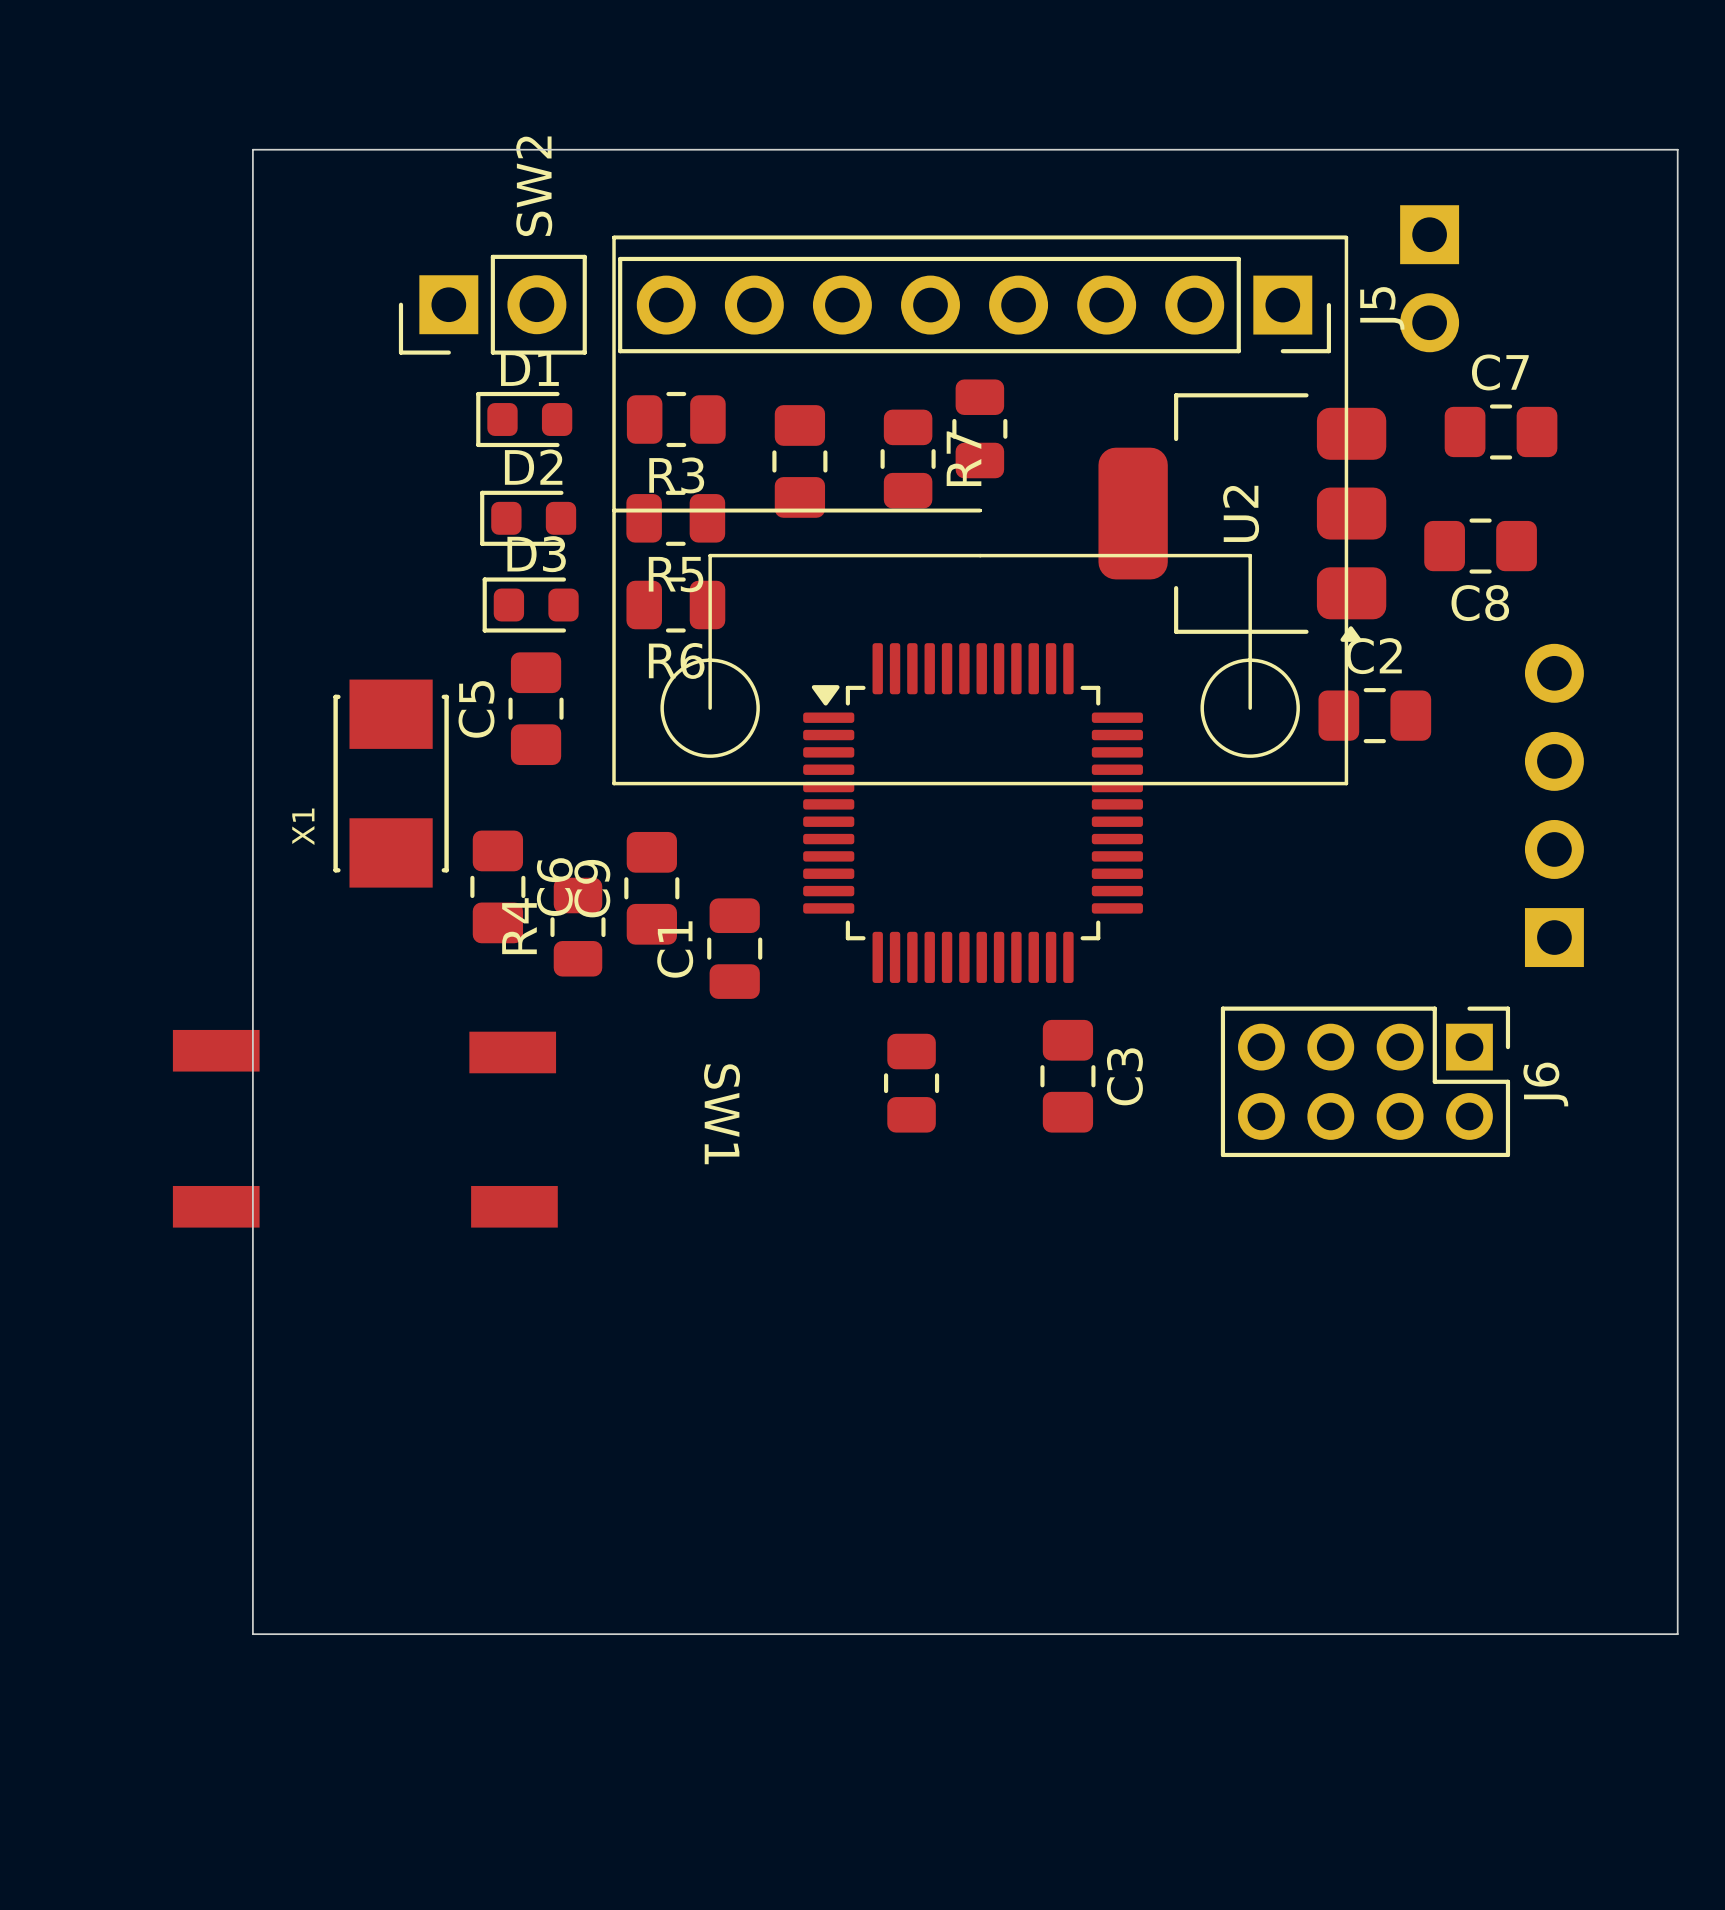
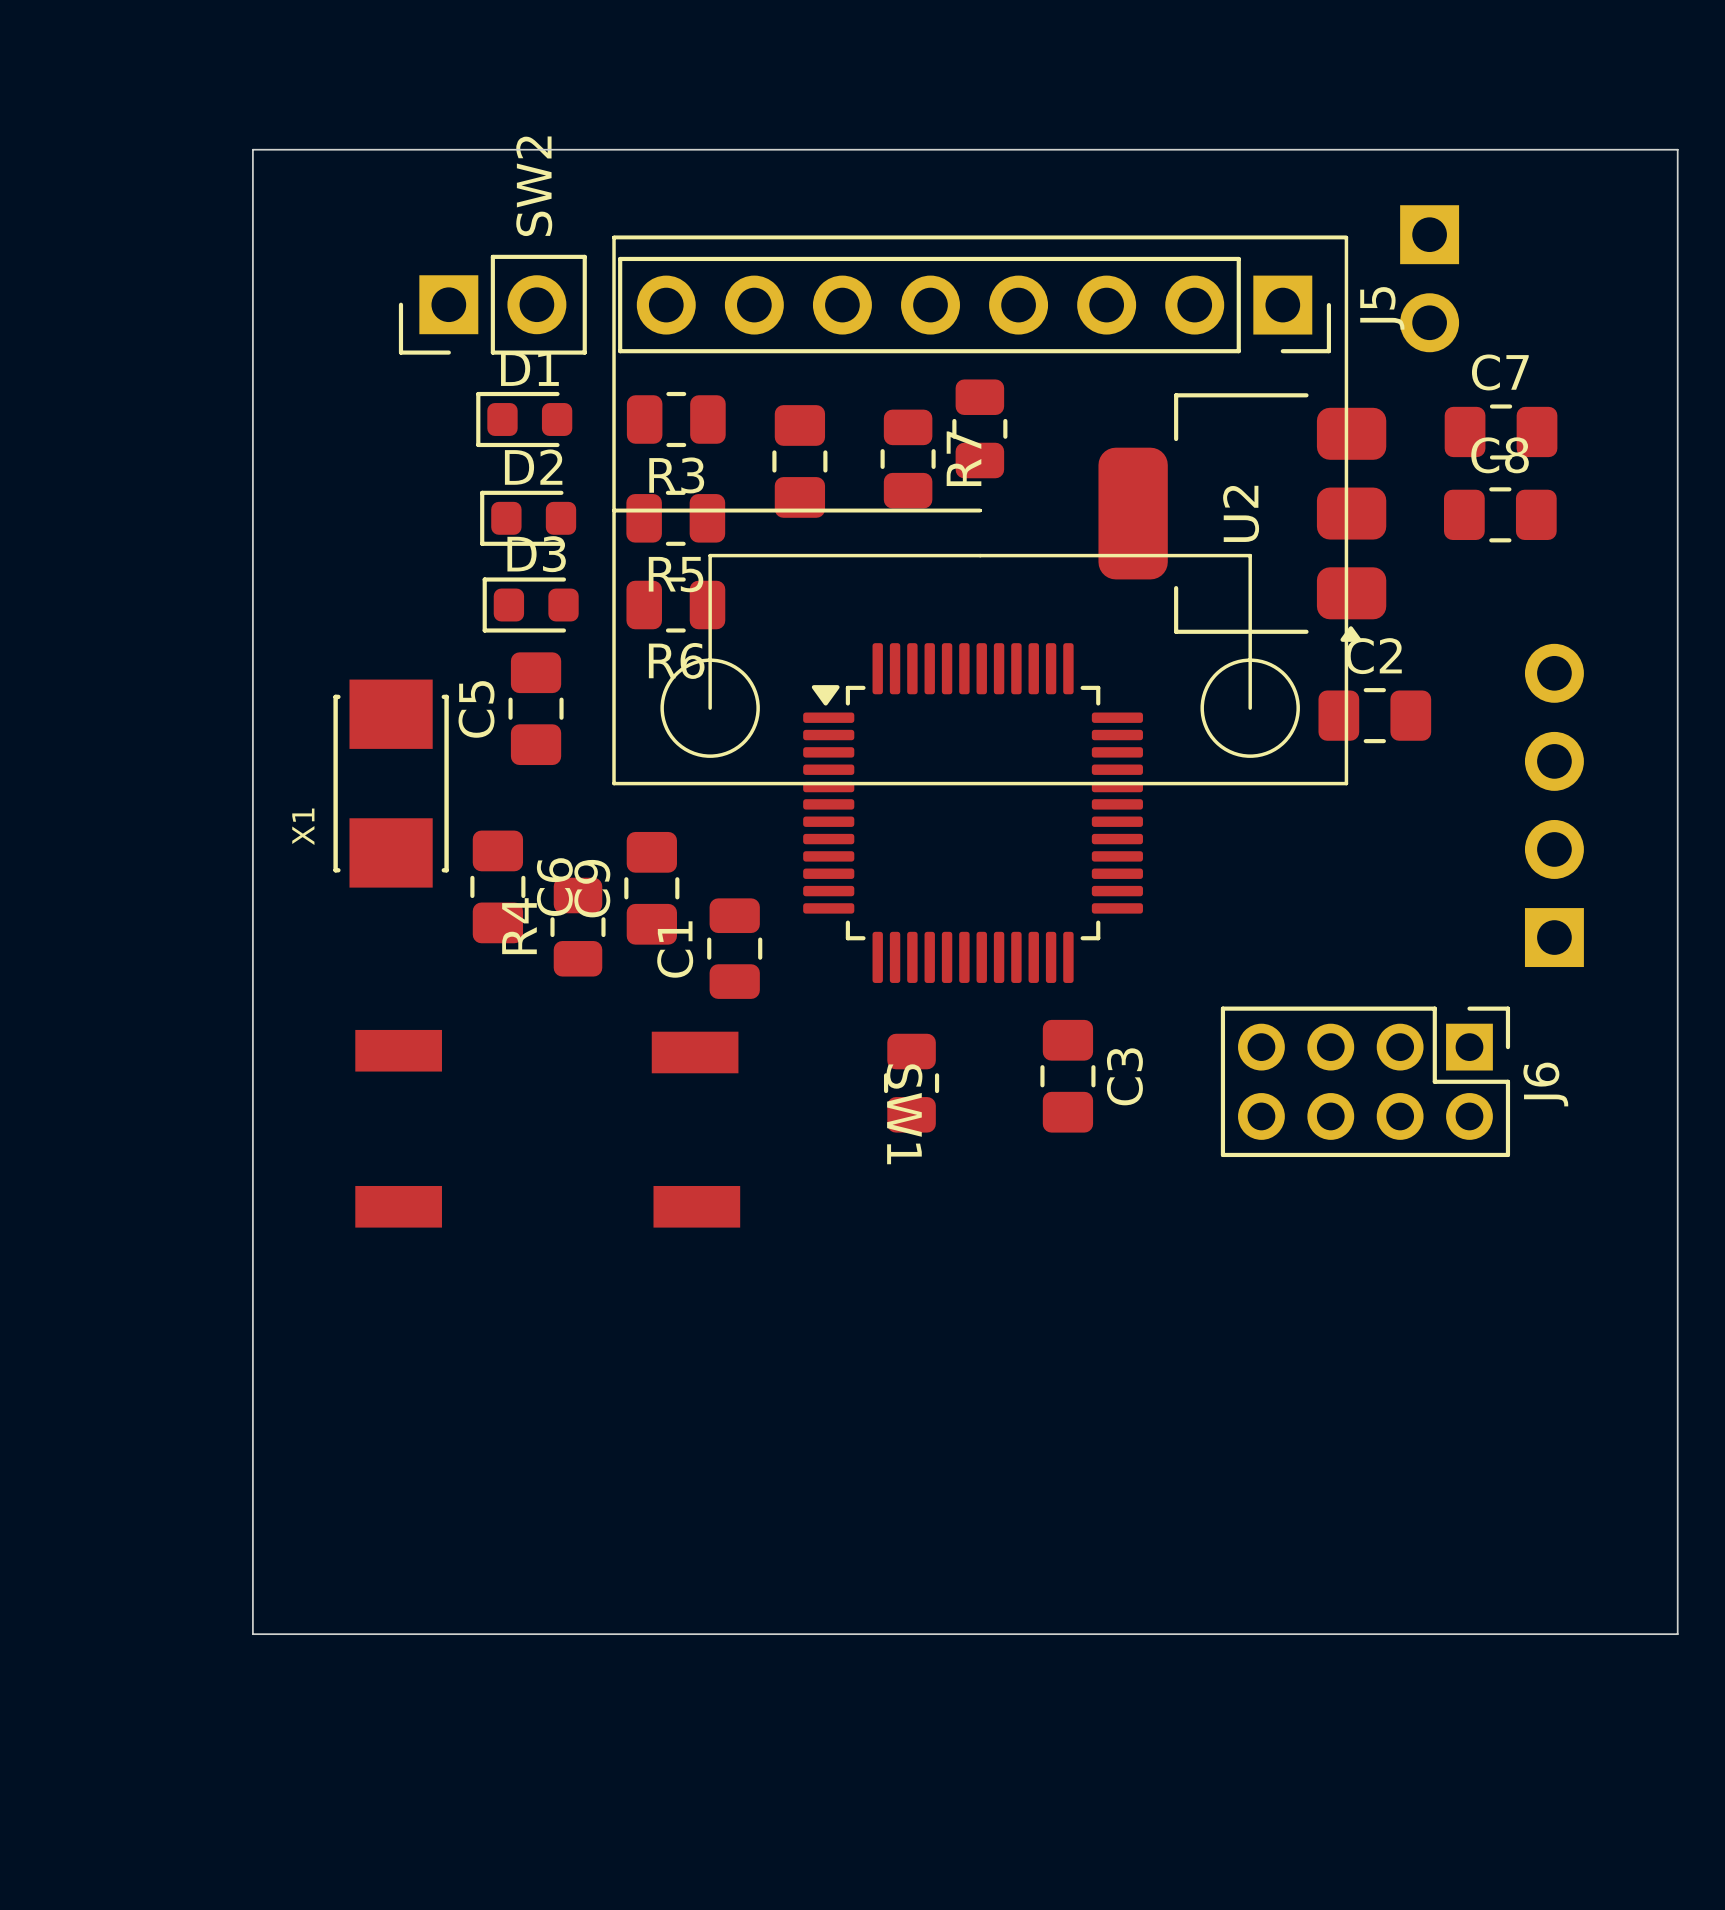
C8 position: (1480, 546) -> (1500, 514)
C8 name position: C8 (1480, 603) -> C8 (1500, 455)
SW1 position: (365, 1128) -> (547, 1128)

